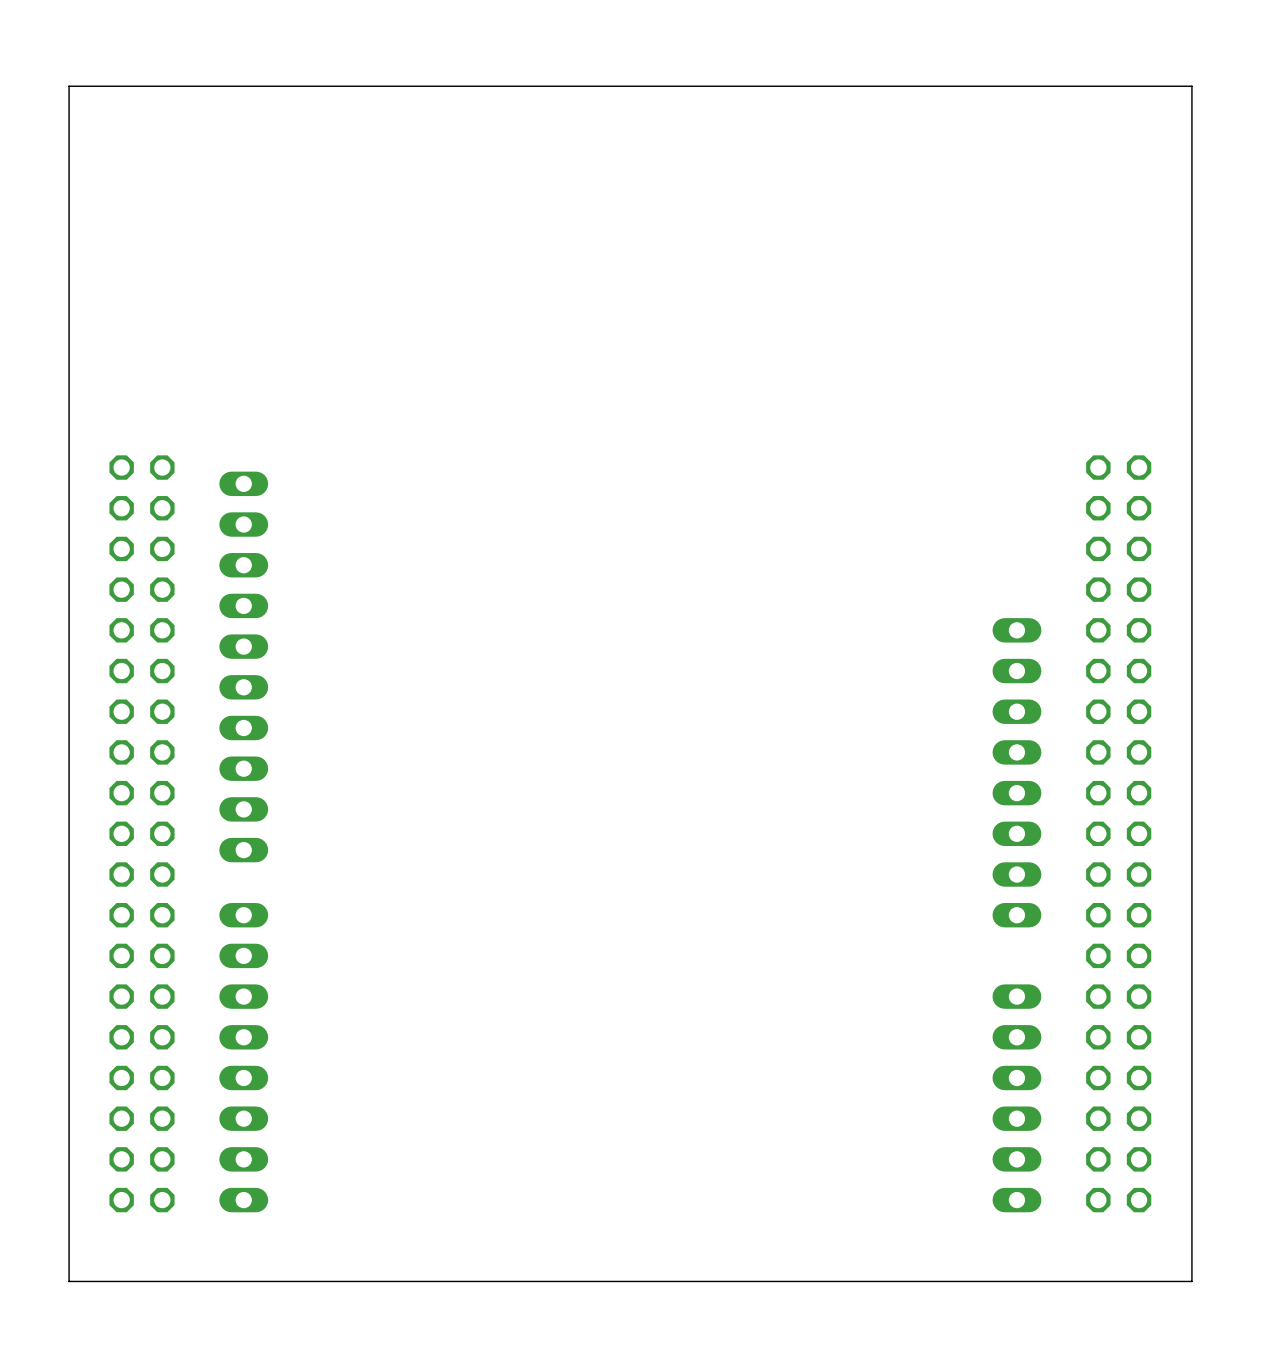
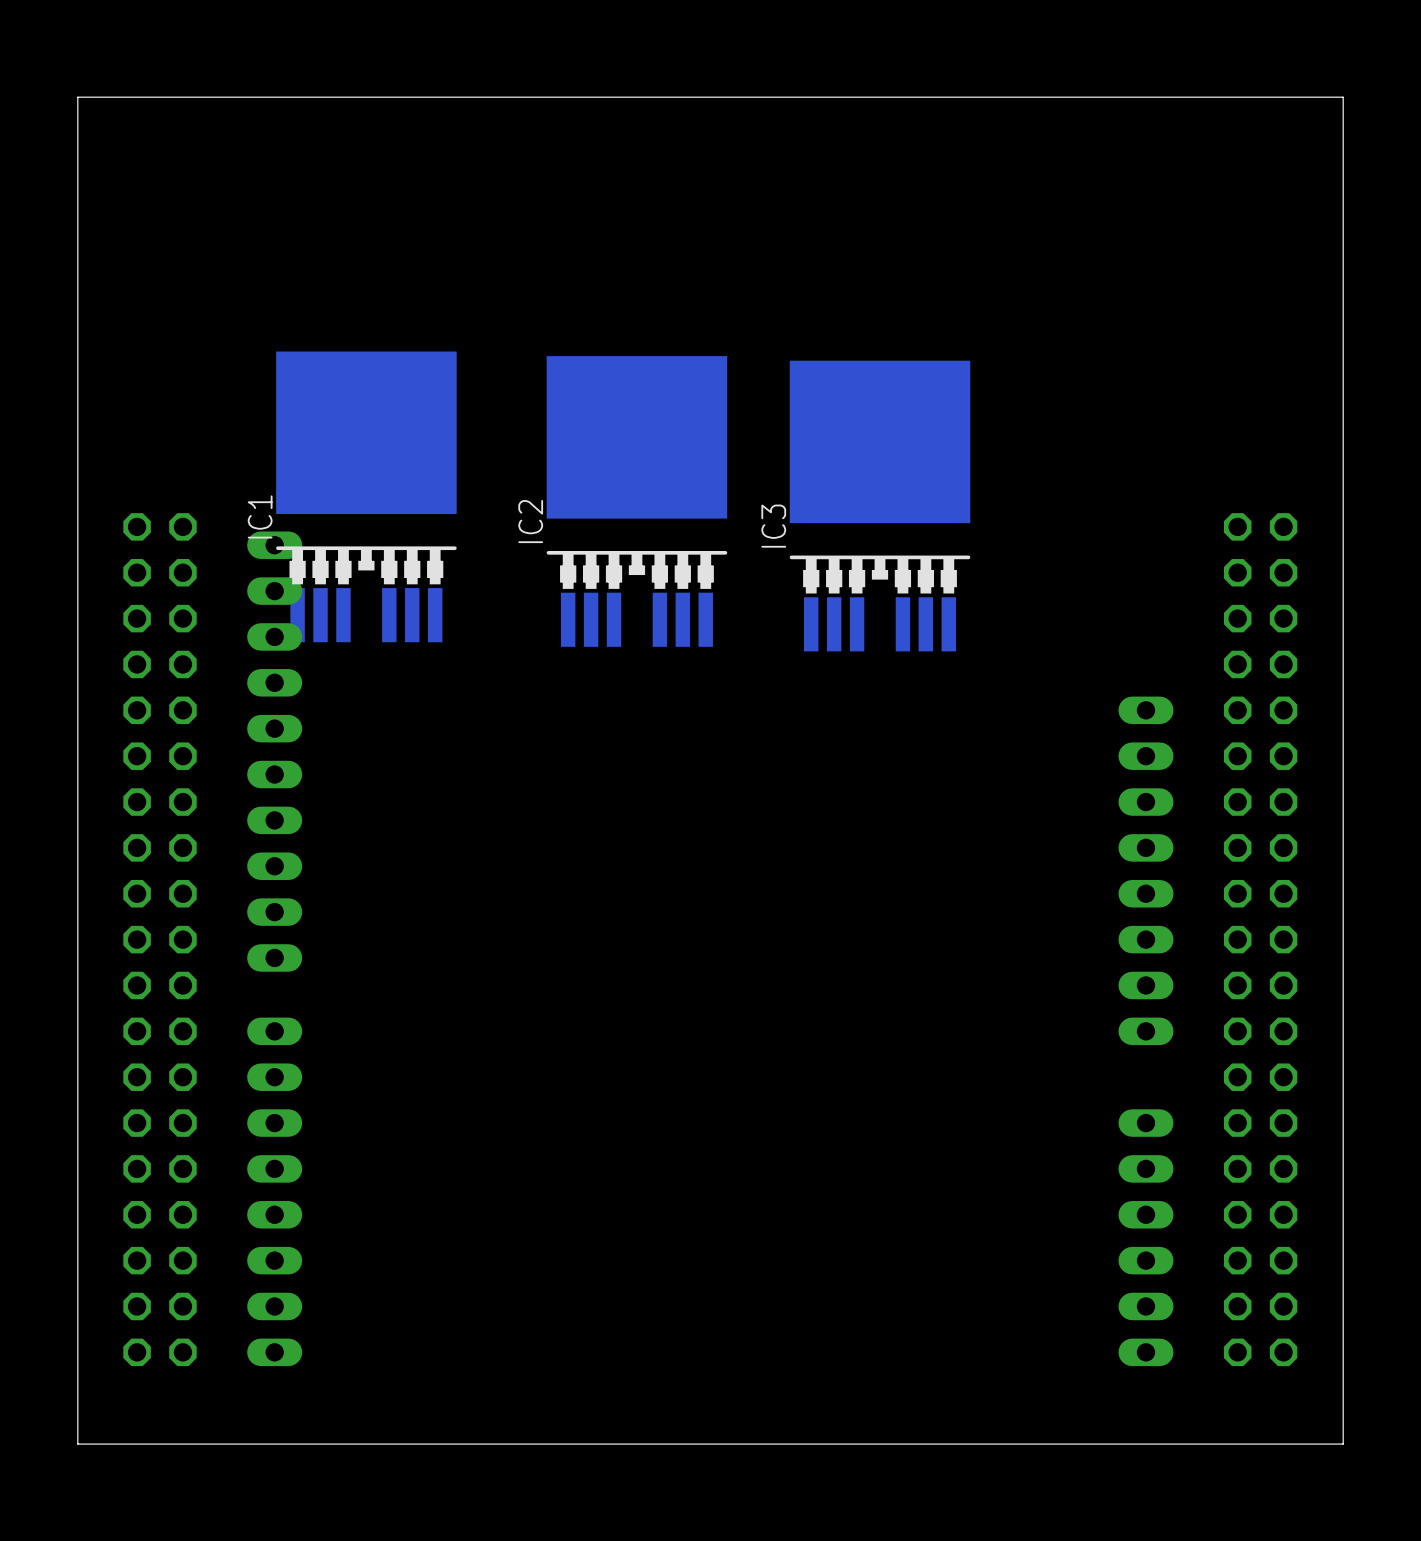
IC1: none -> (366, 496)
IC2: none -> (636, 501)
IC3: none -> (880, 506)

